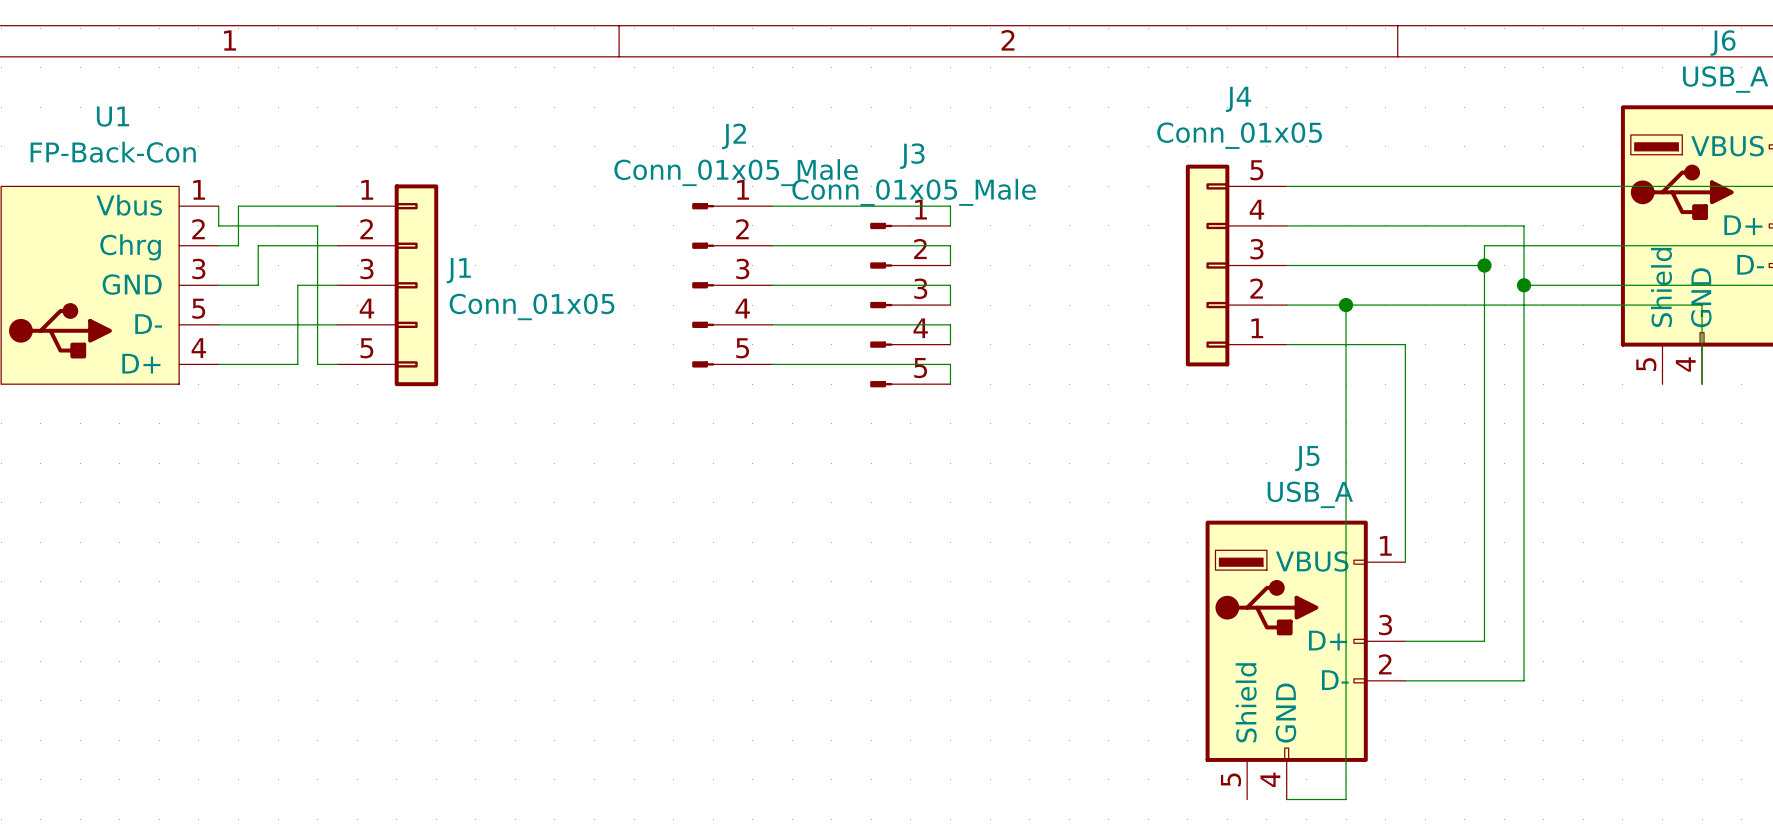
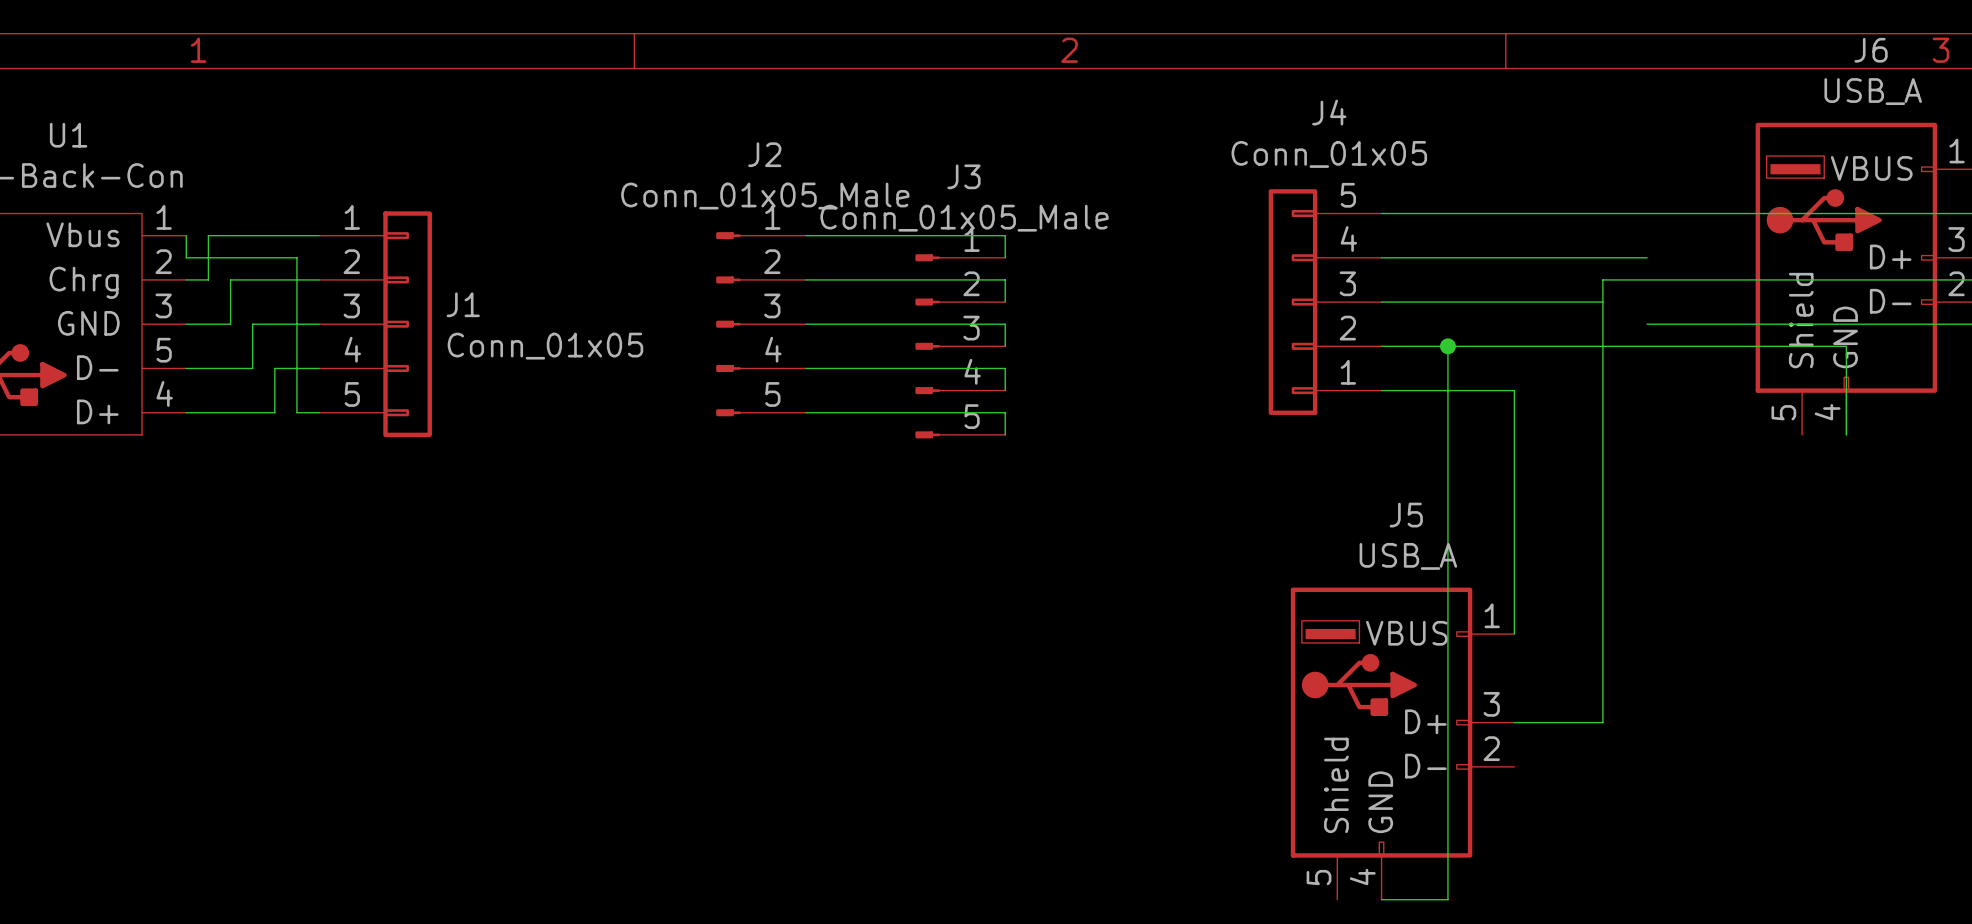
wire: (1524, 225) (1524, 680) (1405, 680) -> none
junction: (1484, 265) -> none
wire: (297, 285) (297, 324) (278, 324) -> (274, 324) (252, 324) (252, 368)
junction: (1524, 285) -> none

